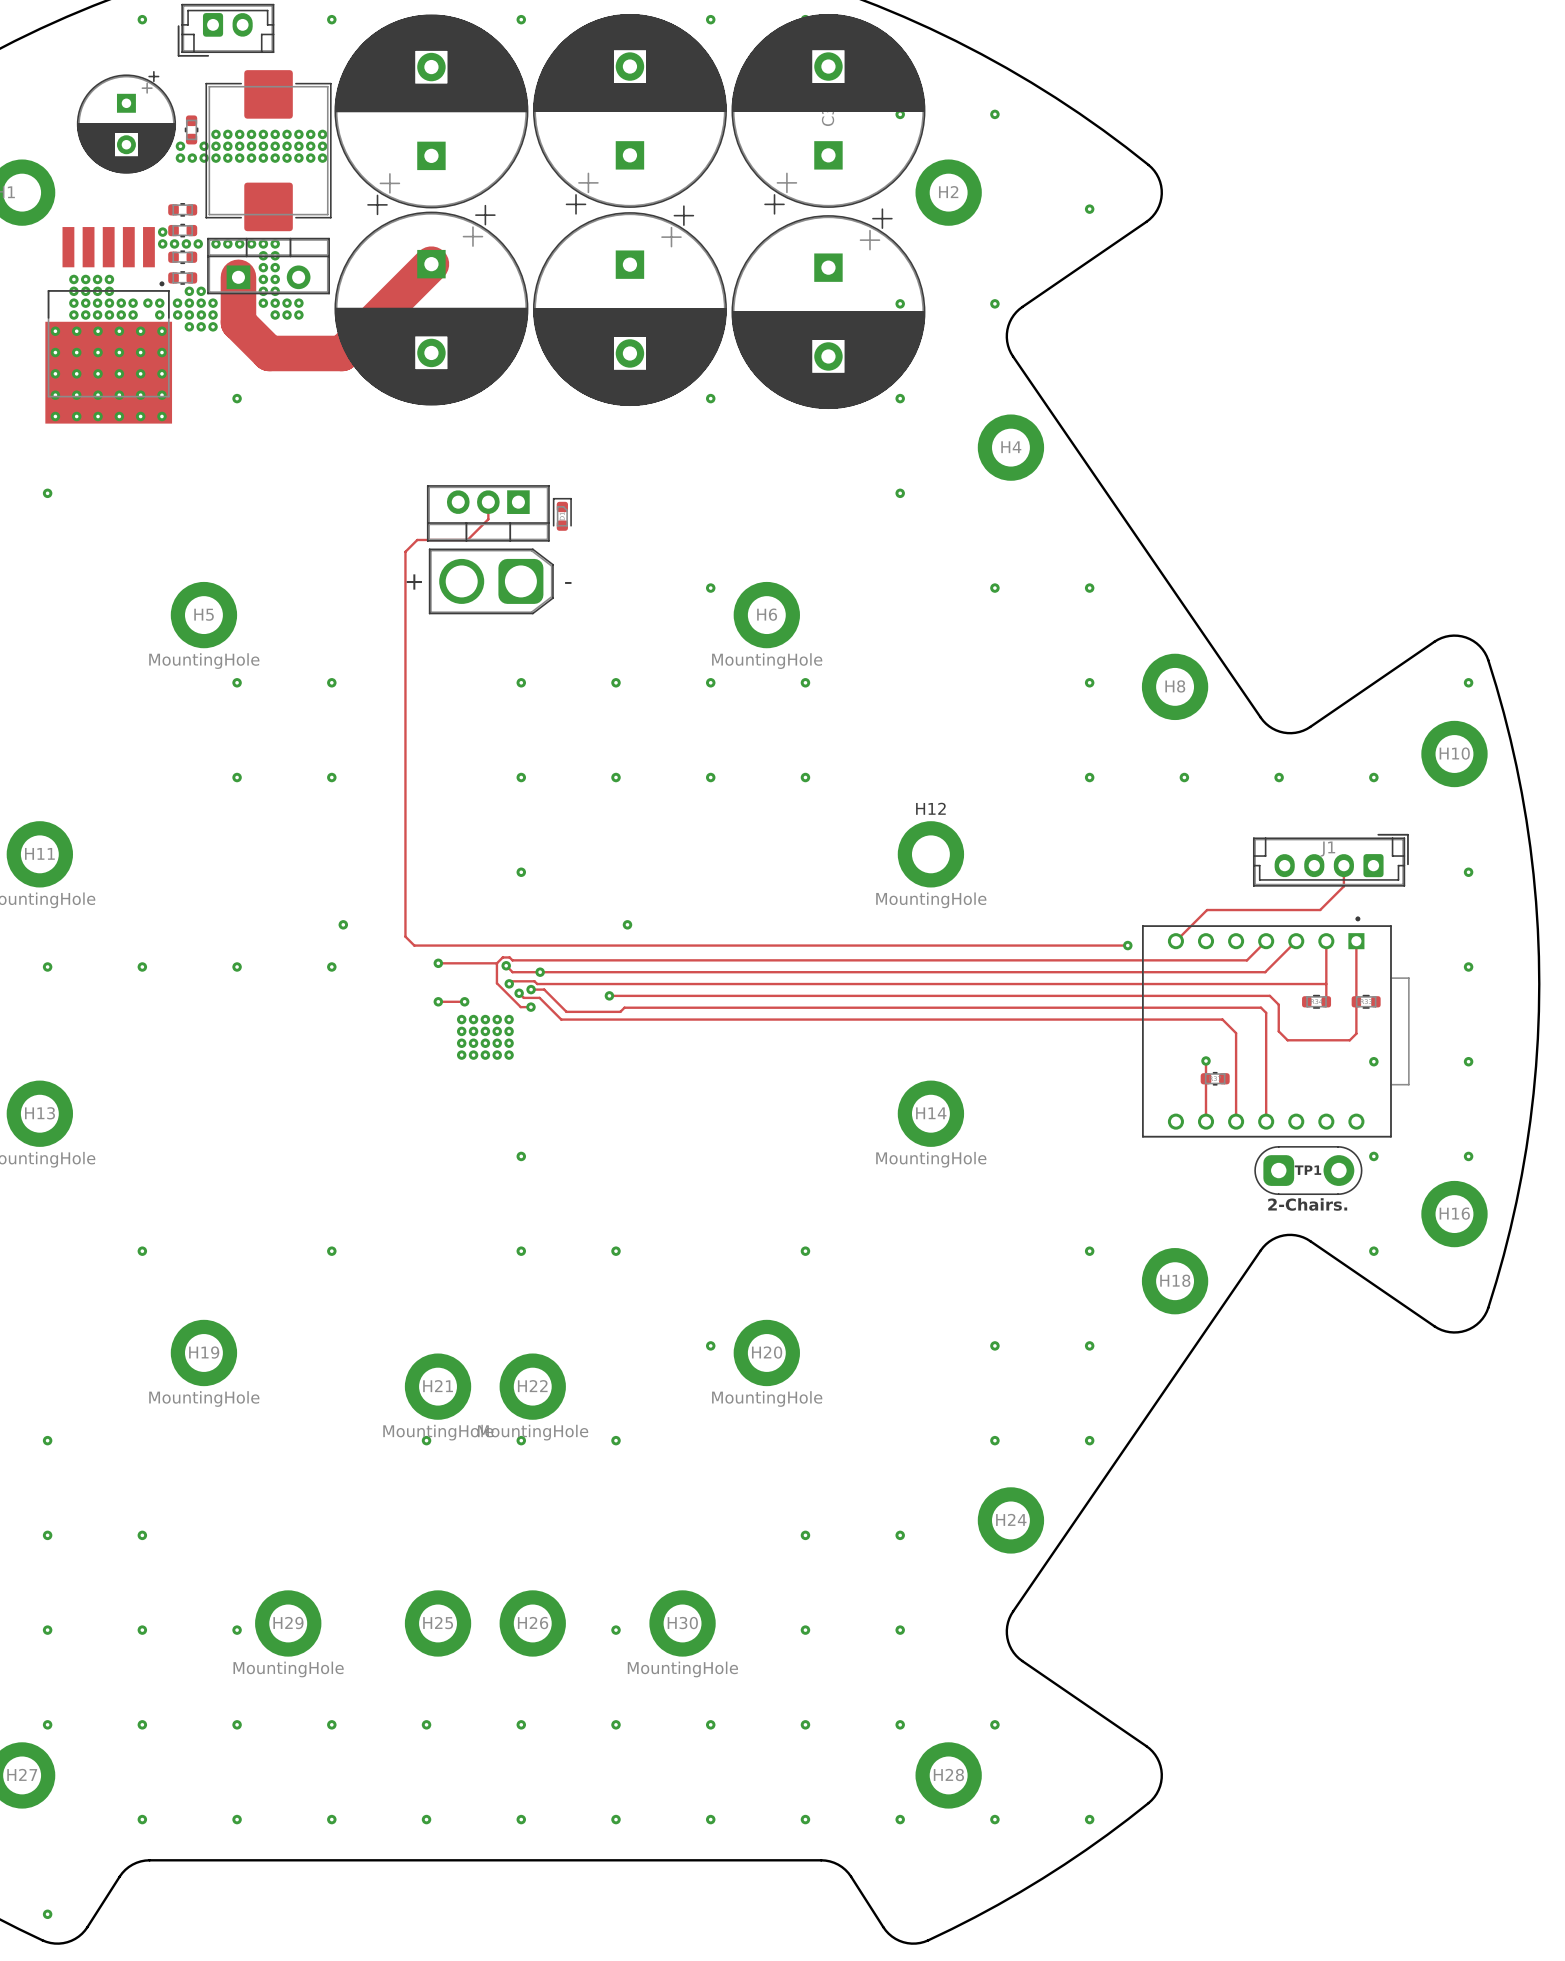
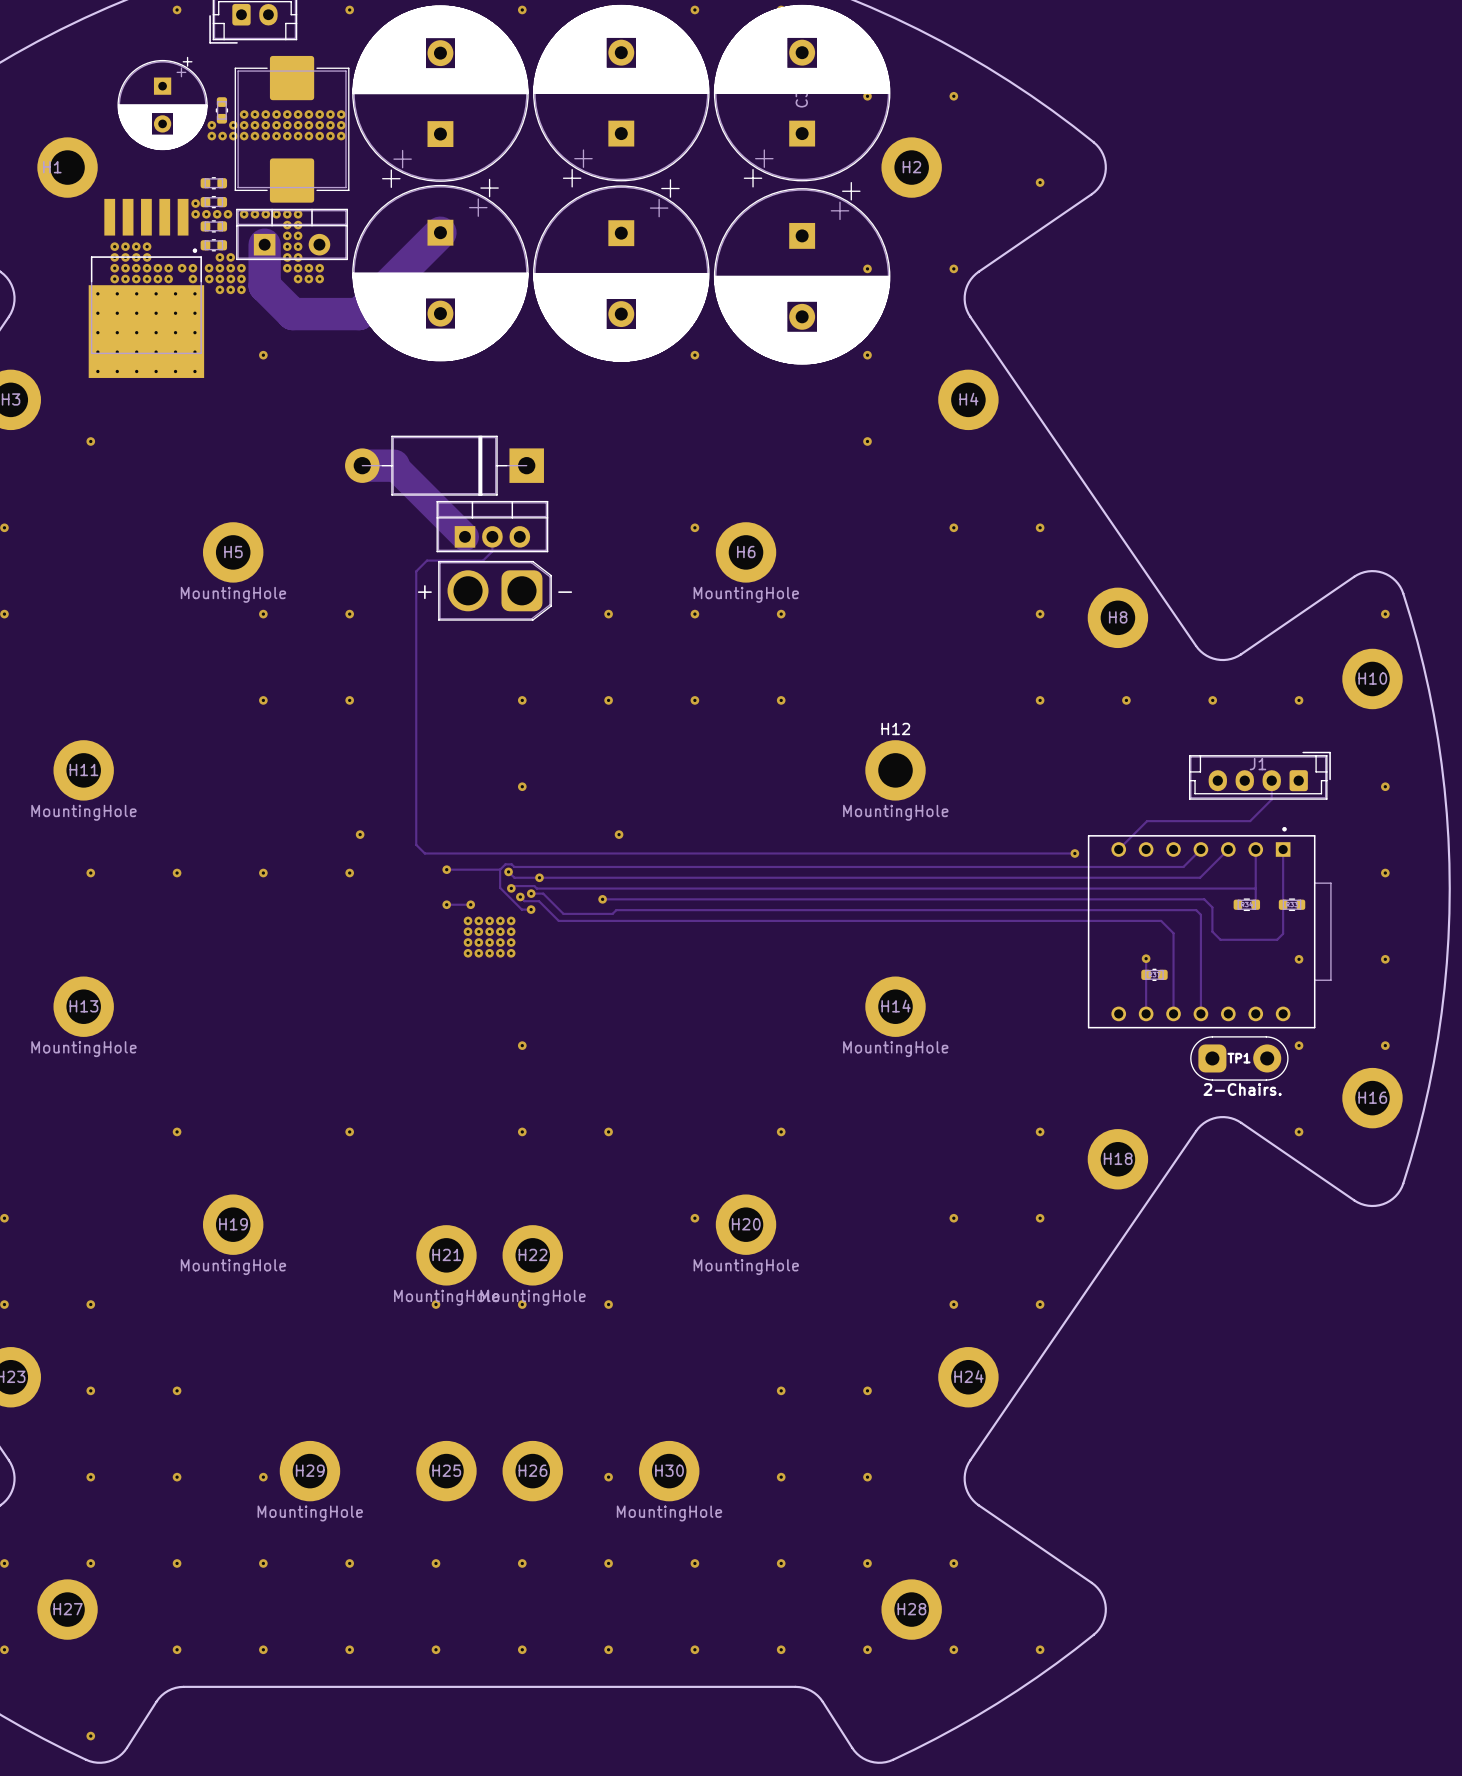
track: (488, 502) (488, 519) (467, 539) (417, 539) (405, 551) (405, 936) -> (492, 536) (492, 551) (483, 560) (427, 560) (416, 571) (416, 845)
part: (488, 513) -> none
part: (562, 514) -> none
track: none -> (362, 465) (393, 465) (465, 536)
part: none -> (444, 465)
part footprint: [428, 548, 554, 615] -> [436, 500, 549, 553]
part: none -> (494, 590)
via: (521, 682) -> none

